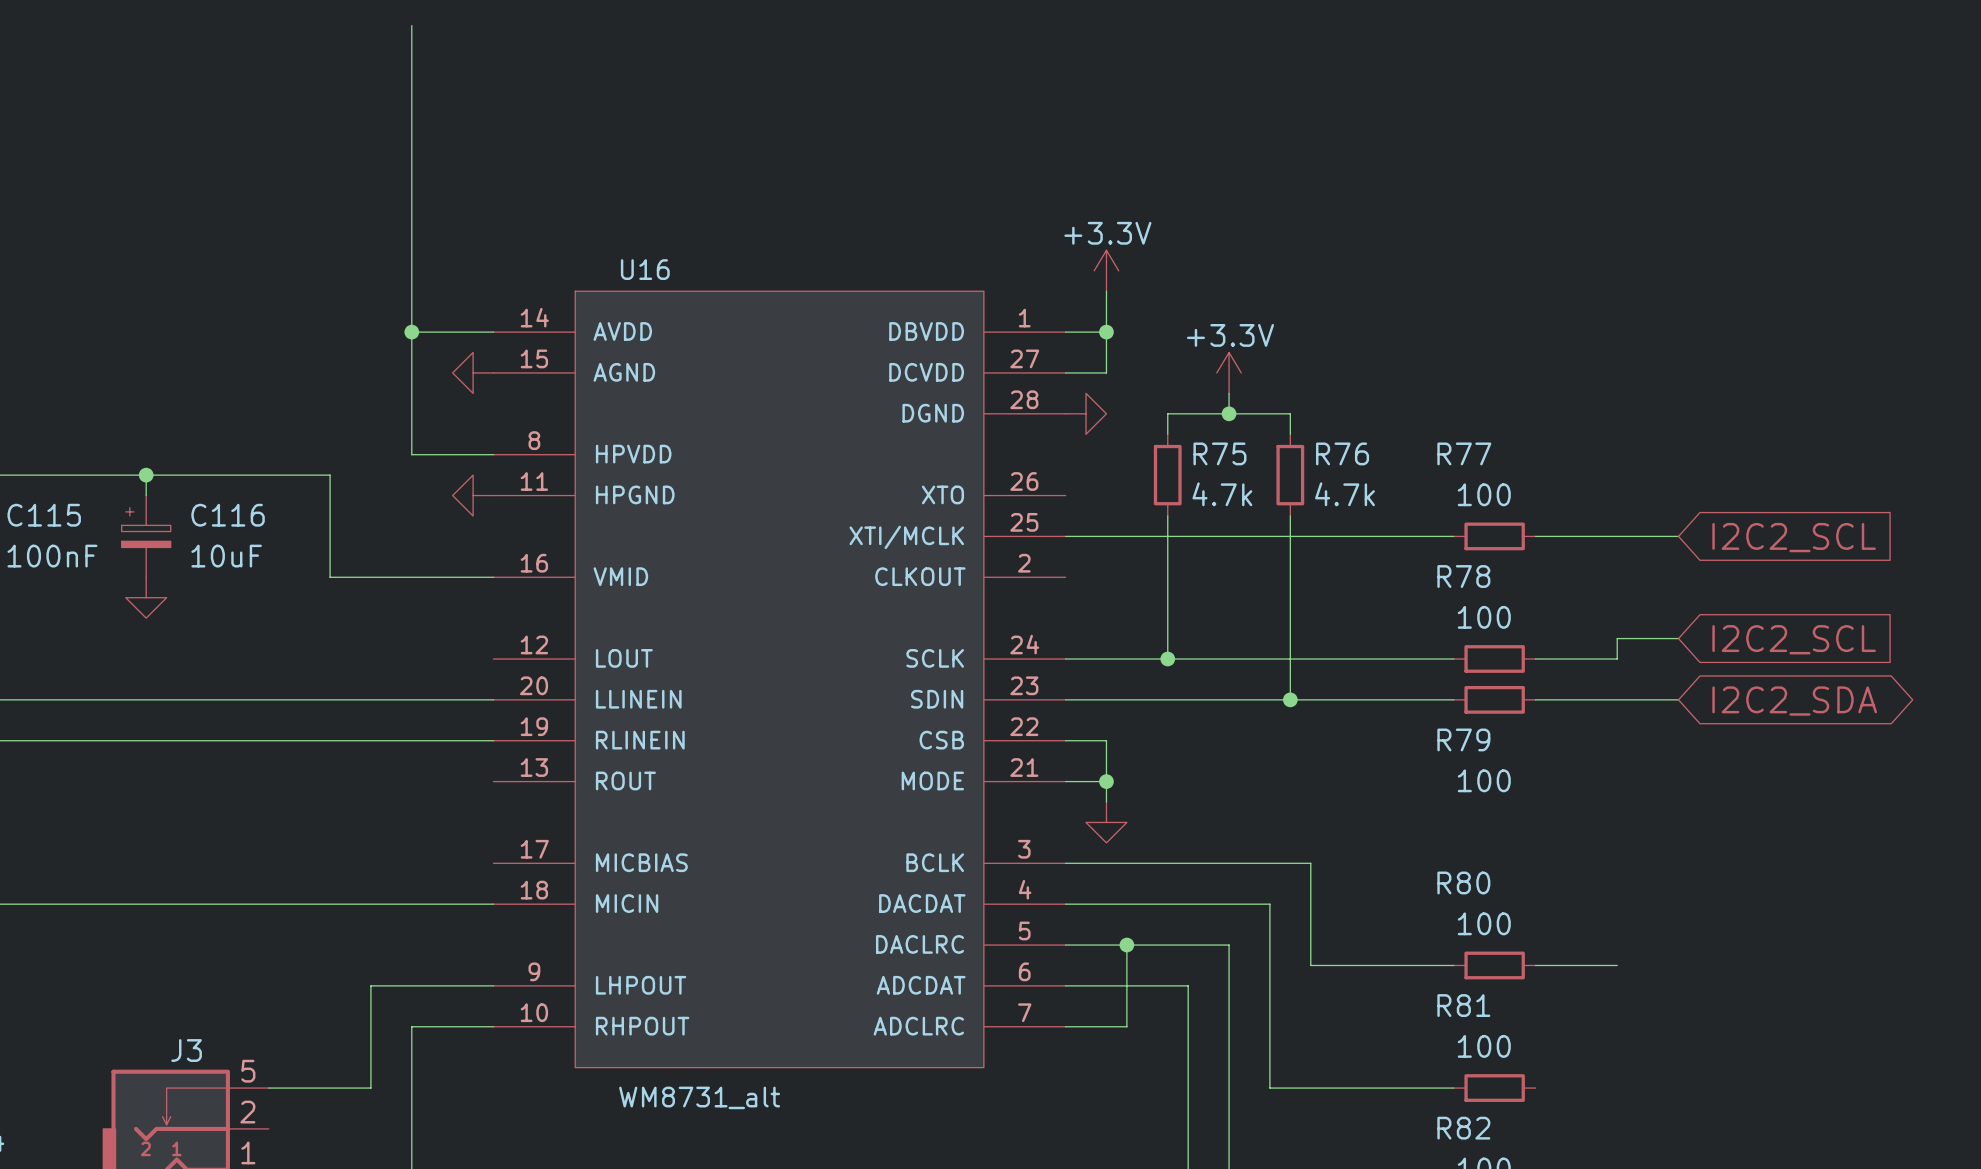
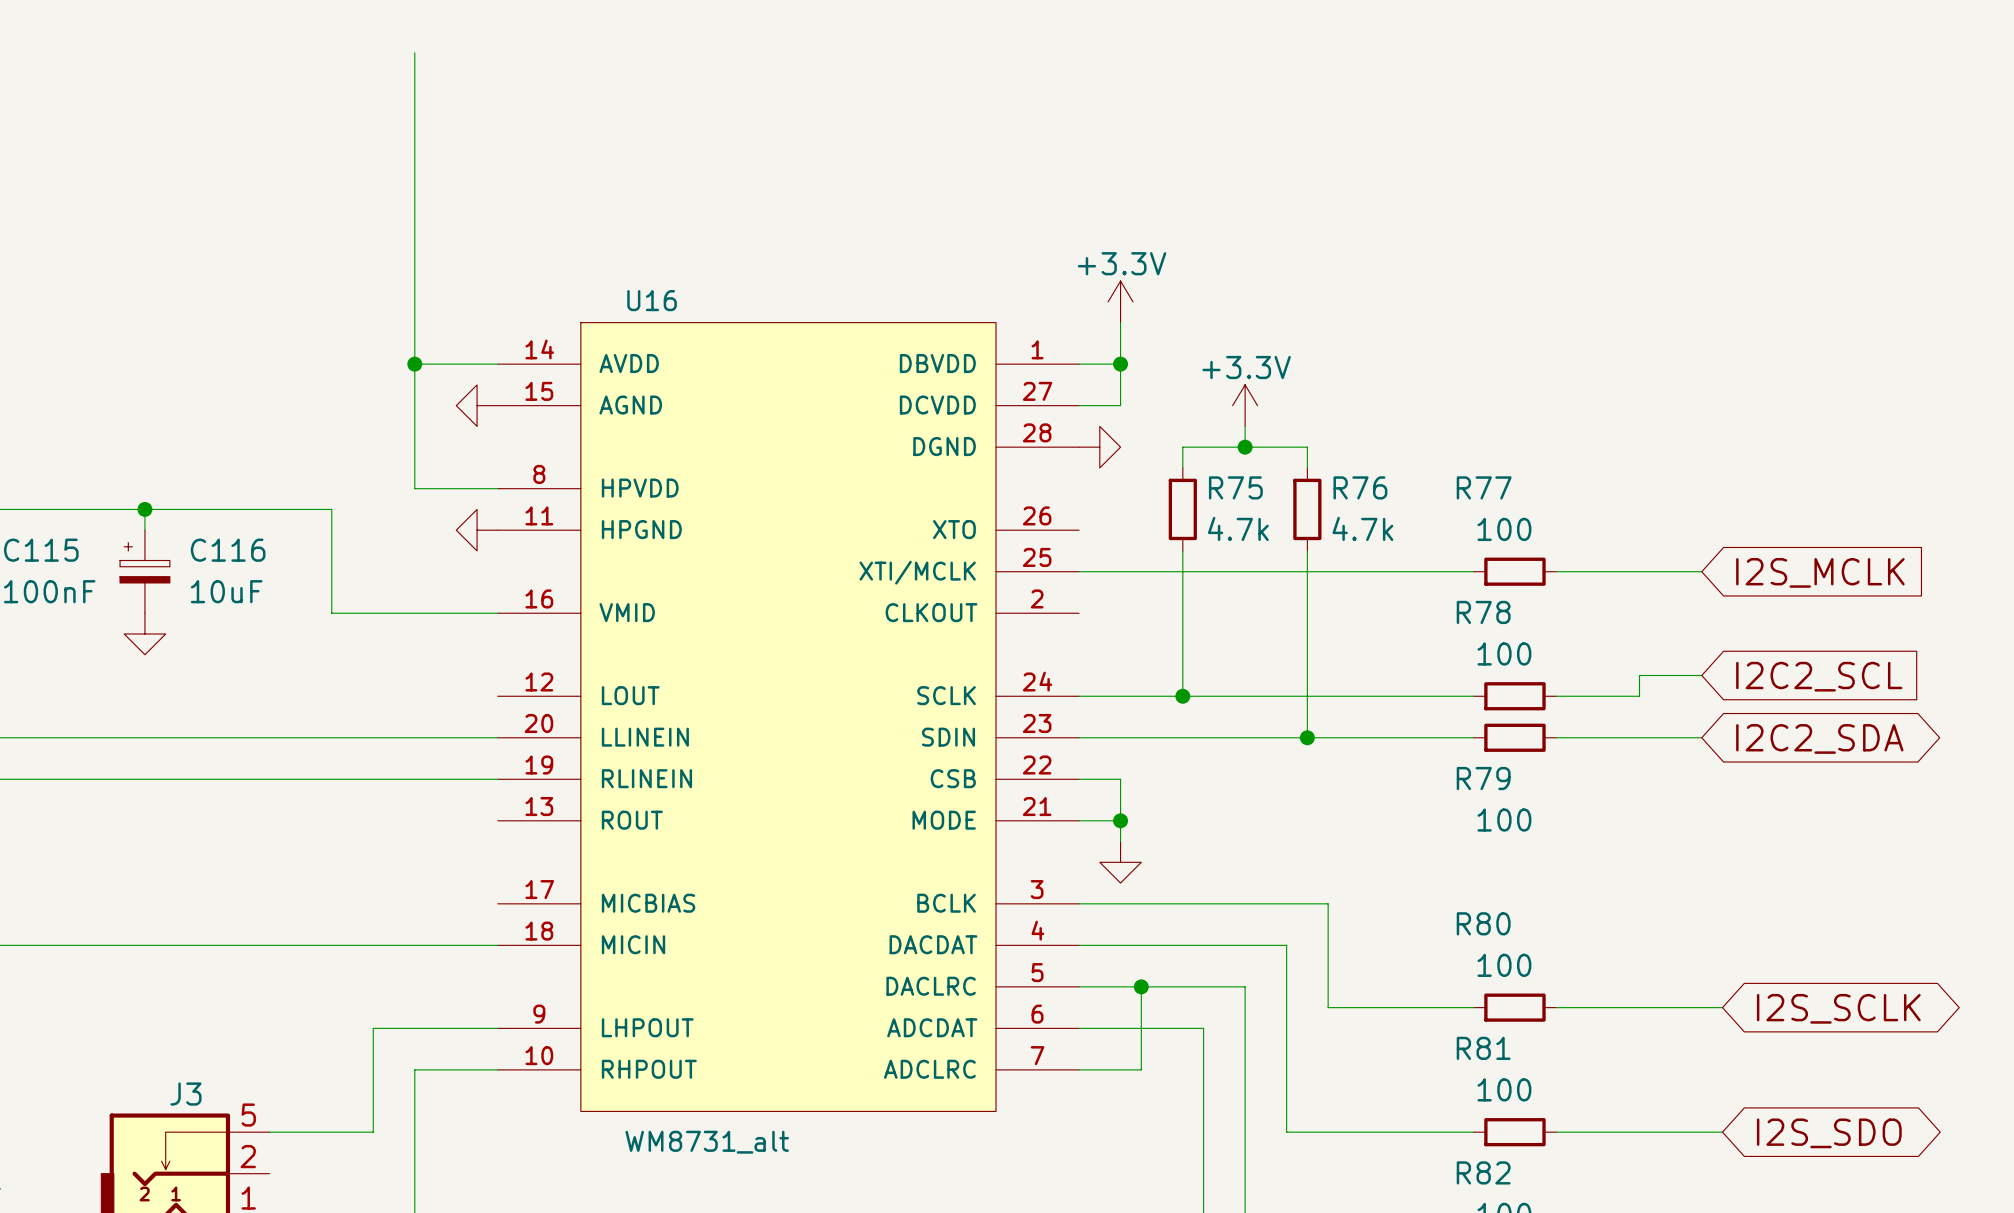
global label: I2C2_SCL (1794, 537) -> I2S_MCLK (1820, 572)
wire: none -> (1639, 1007) (1722, 1007)
global label: none -> I2S_SCLK (1838, 1008)
wire: none -> (1556, 1132) (1722, 1132)
global label: none -> I2S_SDO (1829, 1133)

